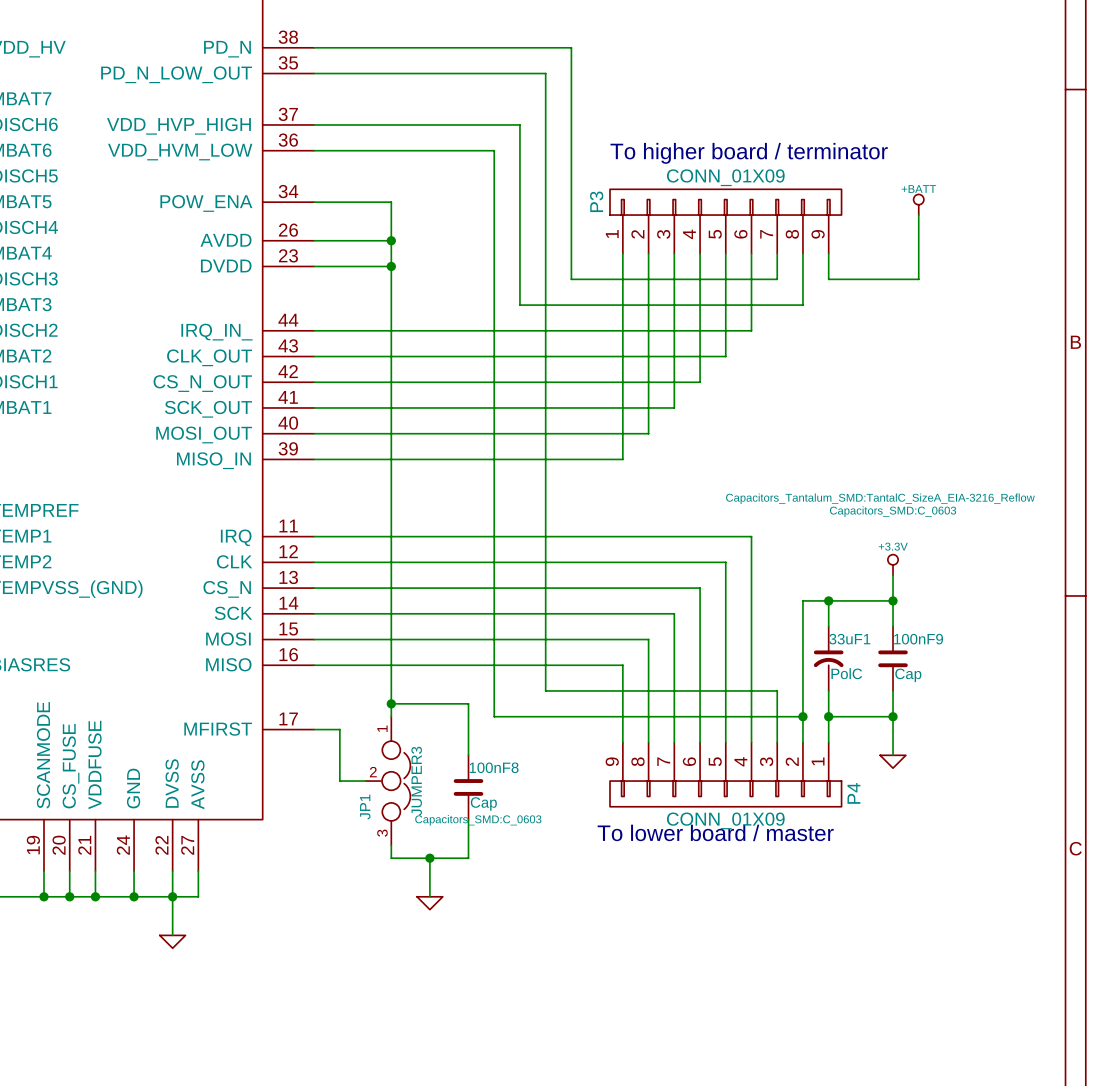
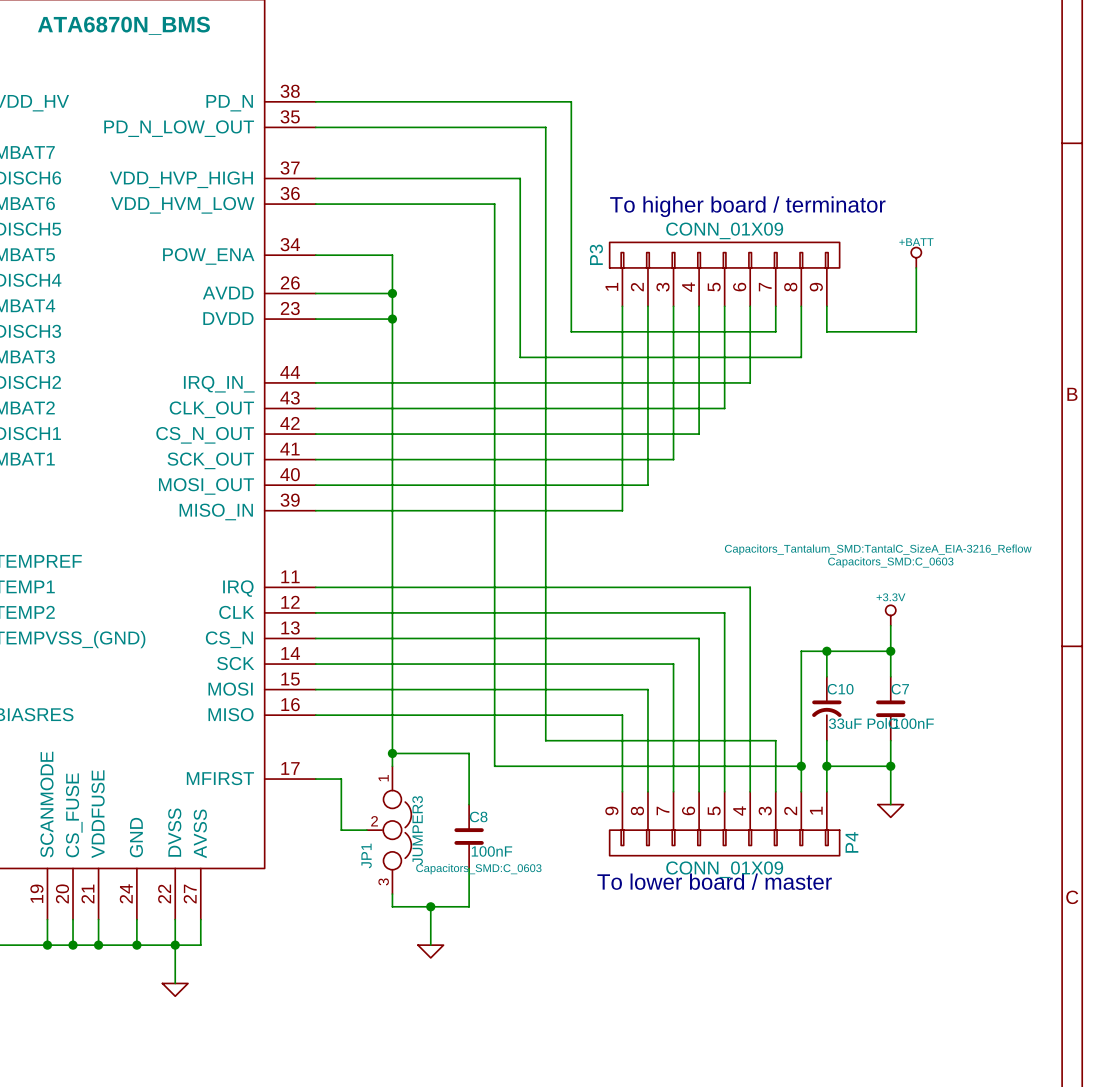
33uF1 name: 33uF1 (849, 639) -> C10 (840, 689)
100nF9 name: 100nF9 (918, 639) -> C7 (900, 689)
33uF1 value: PolC (846, 673) -> 33uF PolC (863, 723)
100nF9 value: Cap (908, 675) -> 100nF (913, 723)
100nF8 name: 100nF8 (494, 767) -> C8 (478, 816)
100nF8 value: Cap (483, 803) -> 100nF (491, 851)

